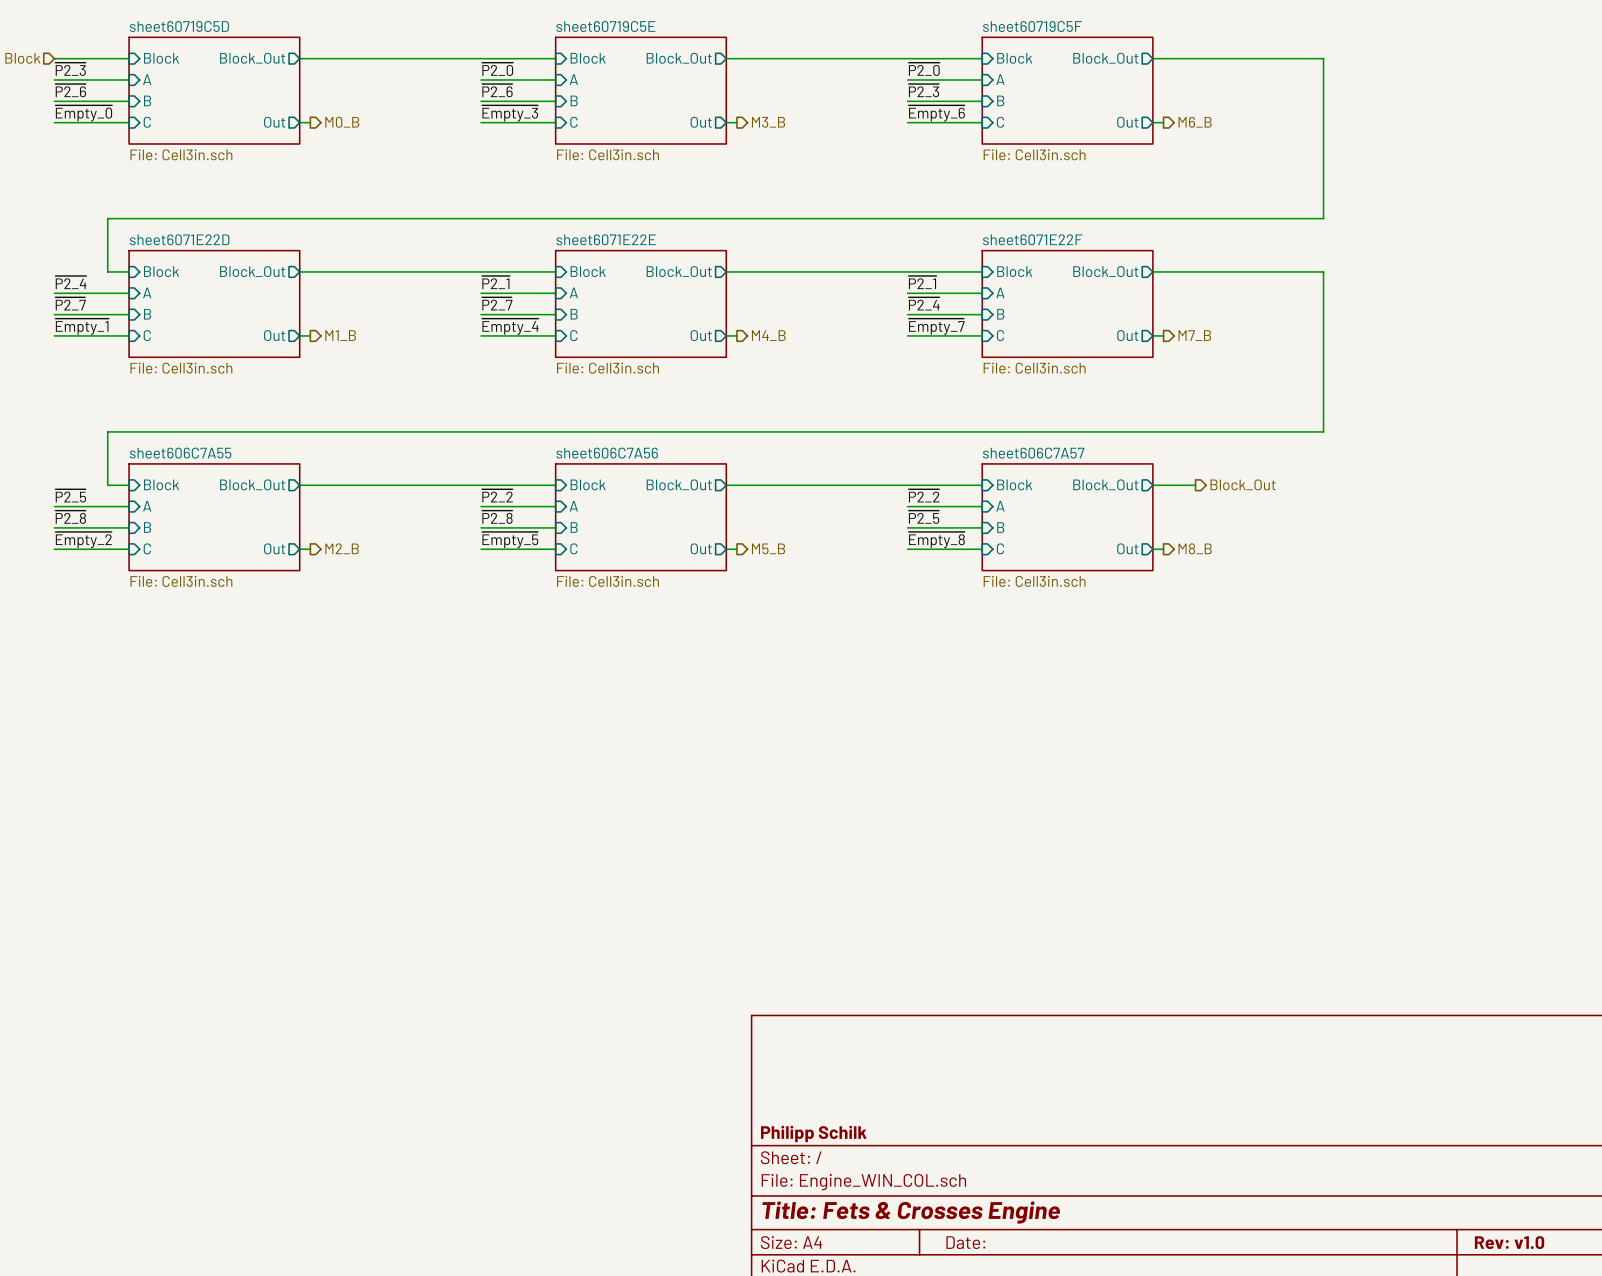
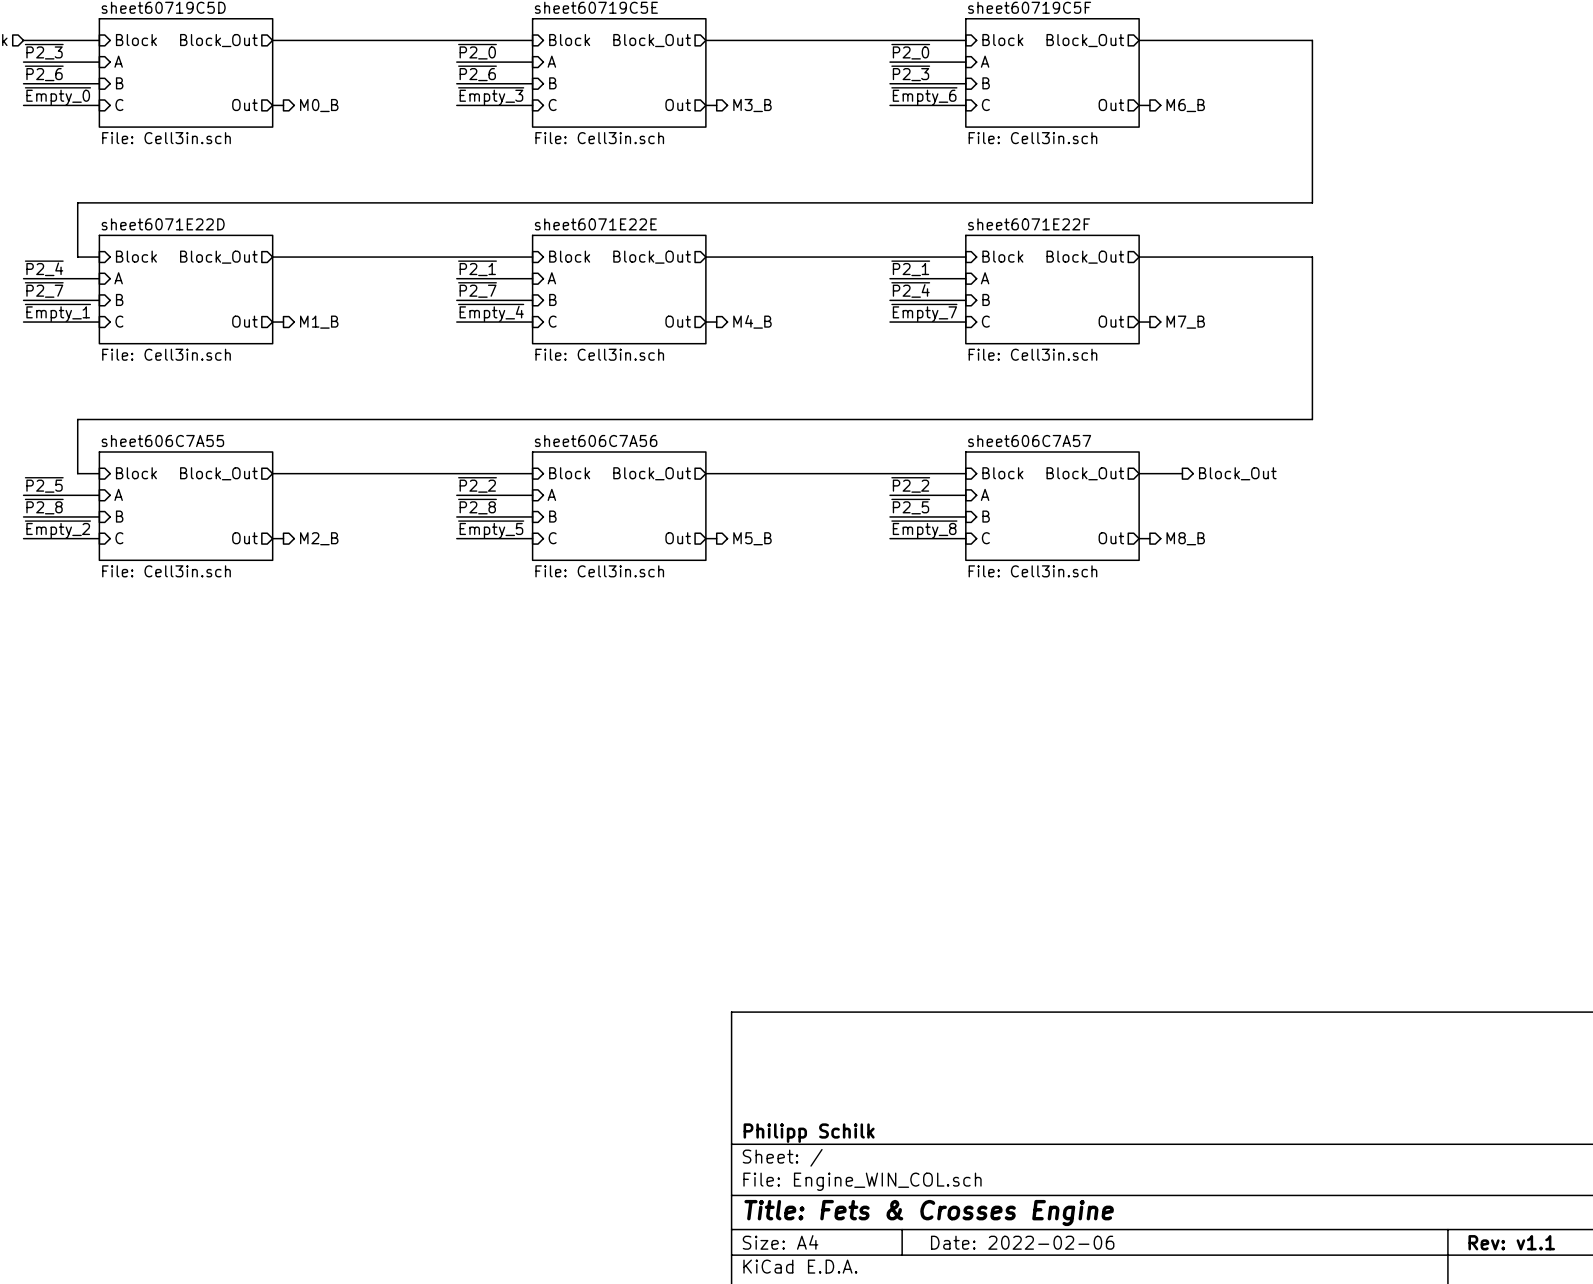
title block: Date: (965, 1242) -> Date: 2022-02-06 (1022, 1242)
title block: Rev: v1.0 (1509, 1242) -> Rev: v1.1 (1511, 1242)

